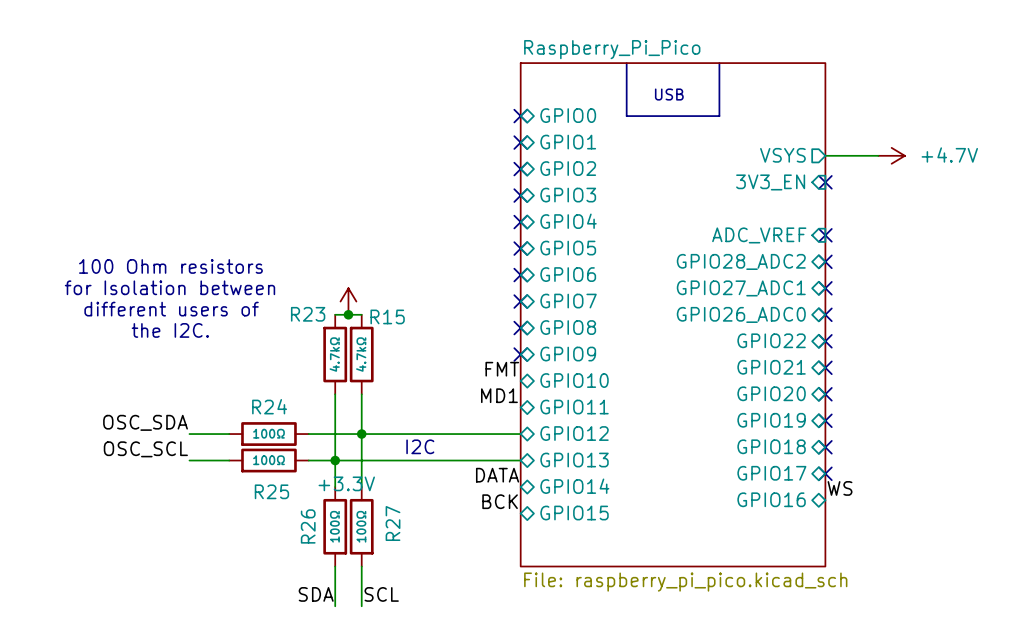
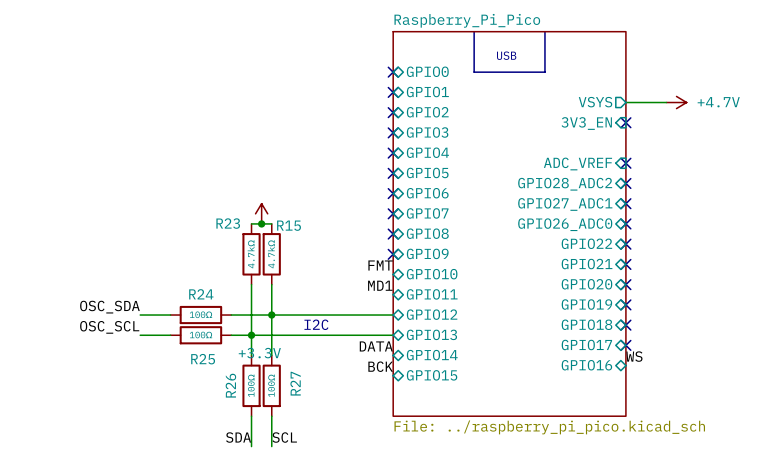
text: 100 Ohm resistors (170, 266) -> none
text: for Isolation between (169, 287) -> none
text: different users of (171, 309) -> none
text: the I2C. (170, 330) -> none
sheet Raspberry_Pi_Pico value: File: raspberry_pi_pico.kicad_sch (685, 582) -> File: ../raspberry_pi_pico.kicad_sch (549, 427)

